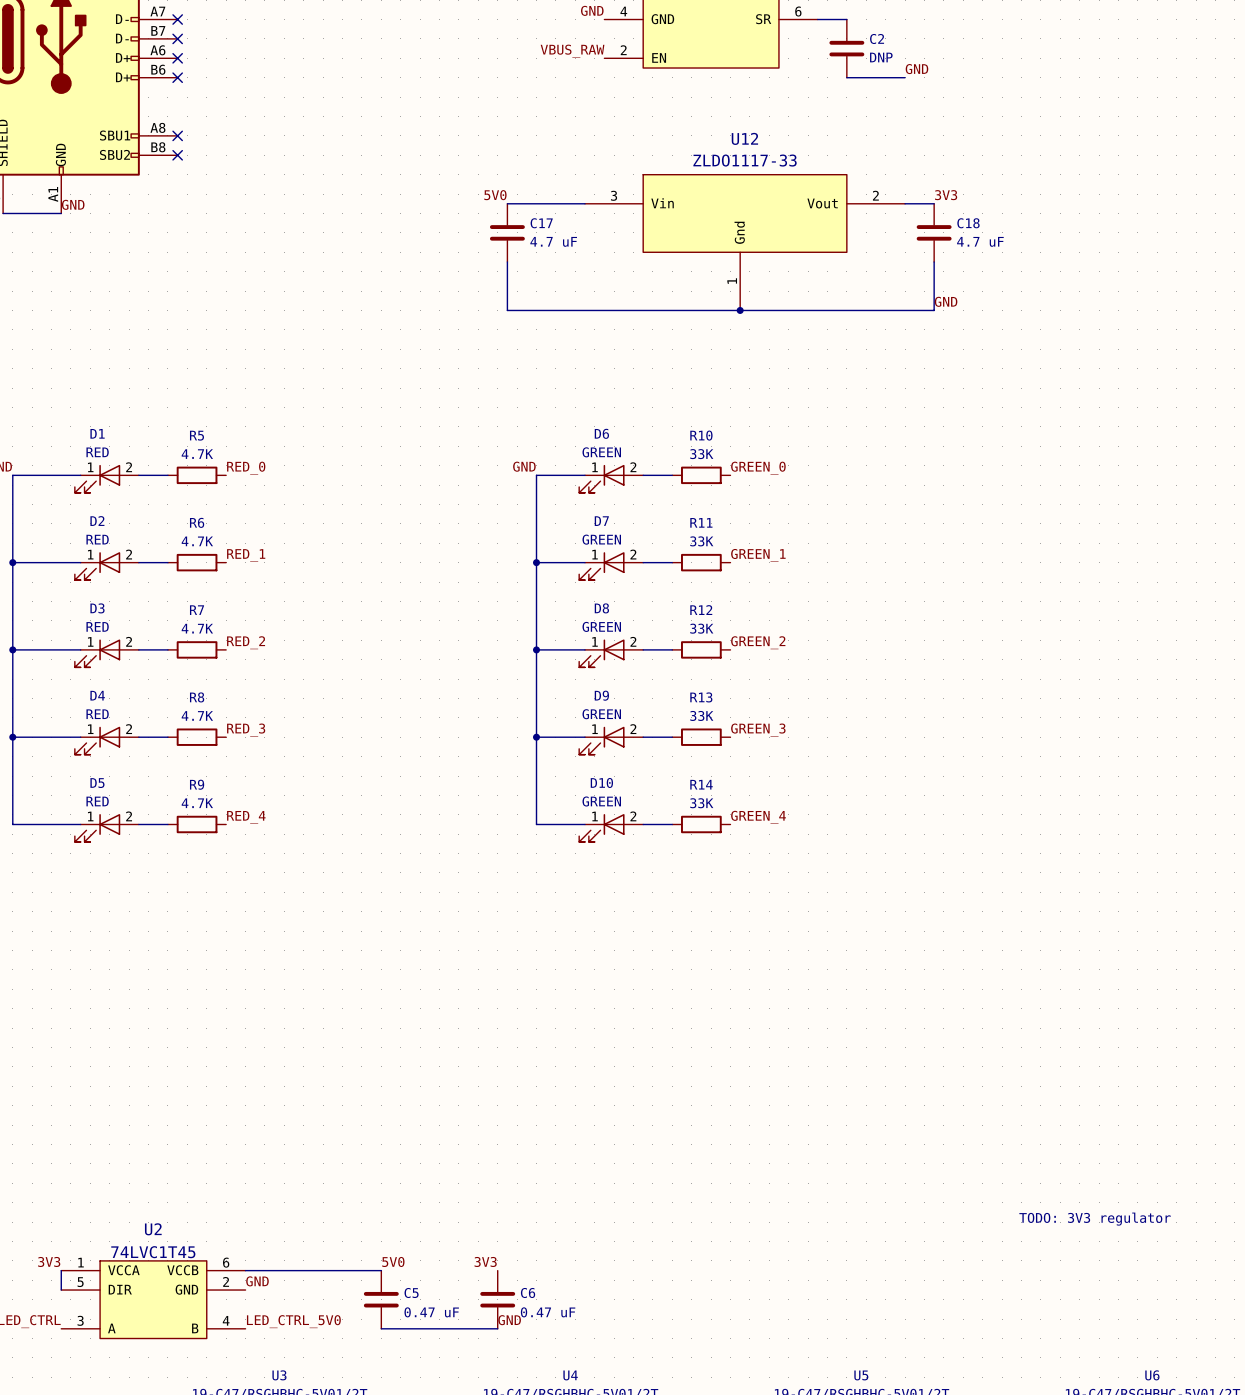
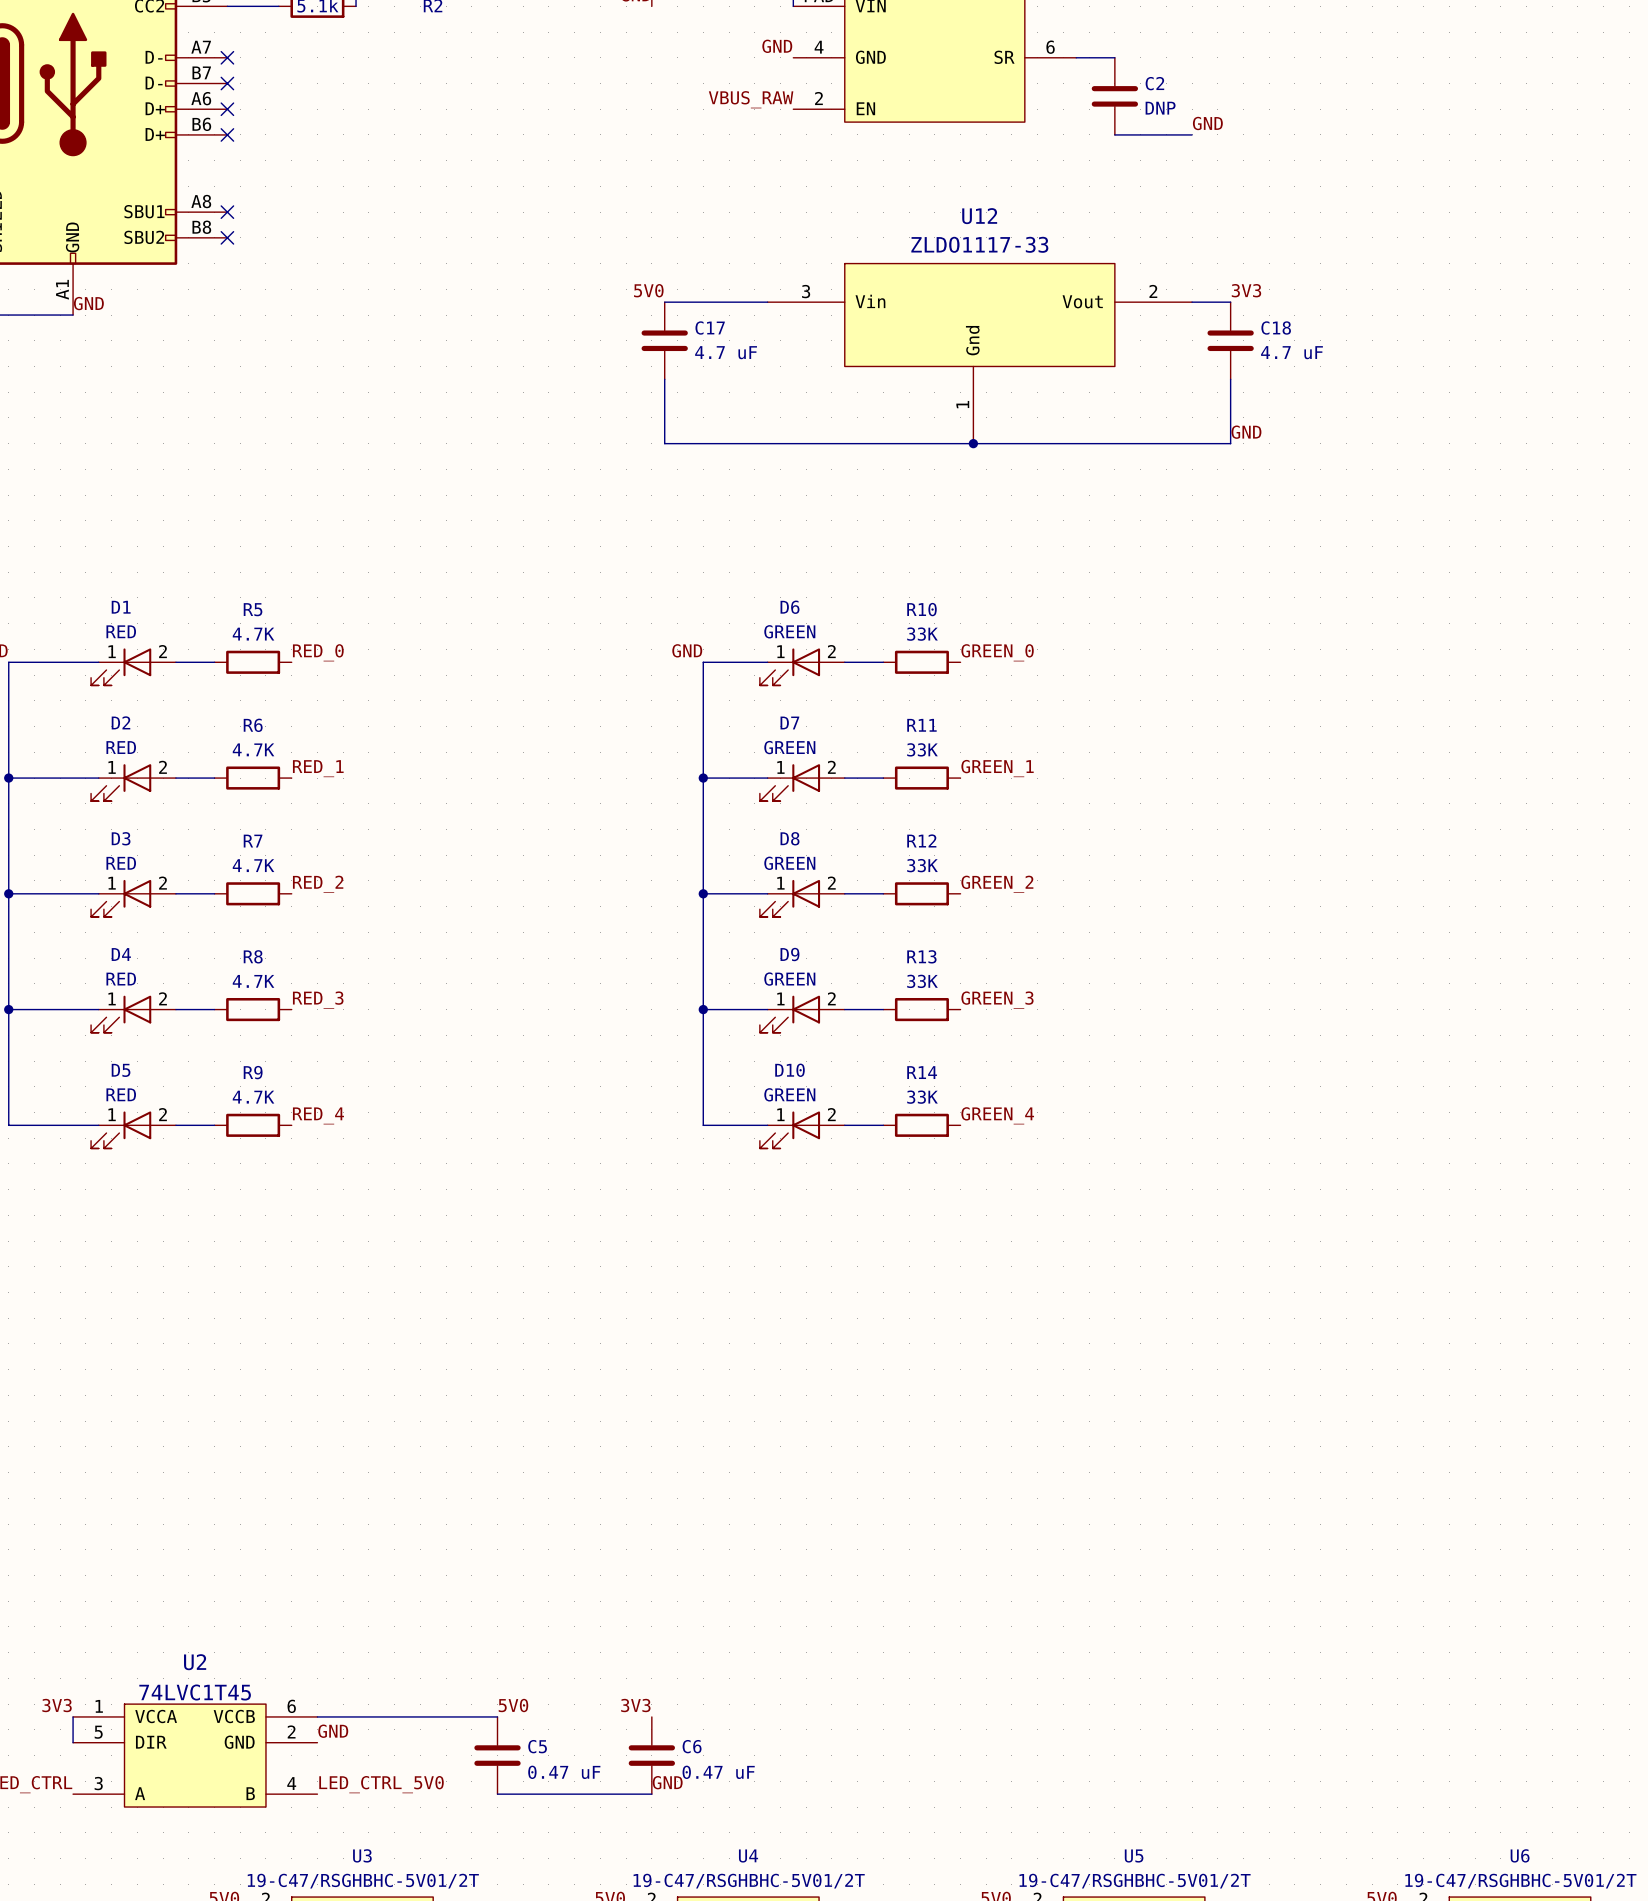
text: TODO: 3V3 regulator (1095, 1219) -> none

